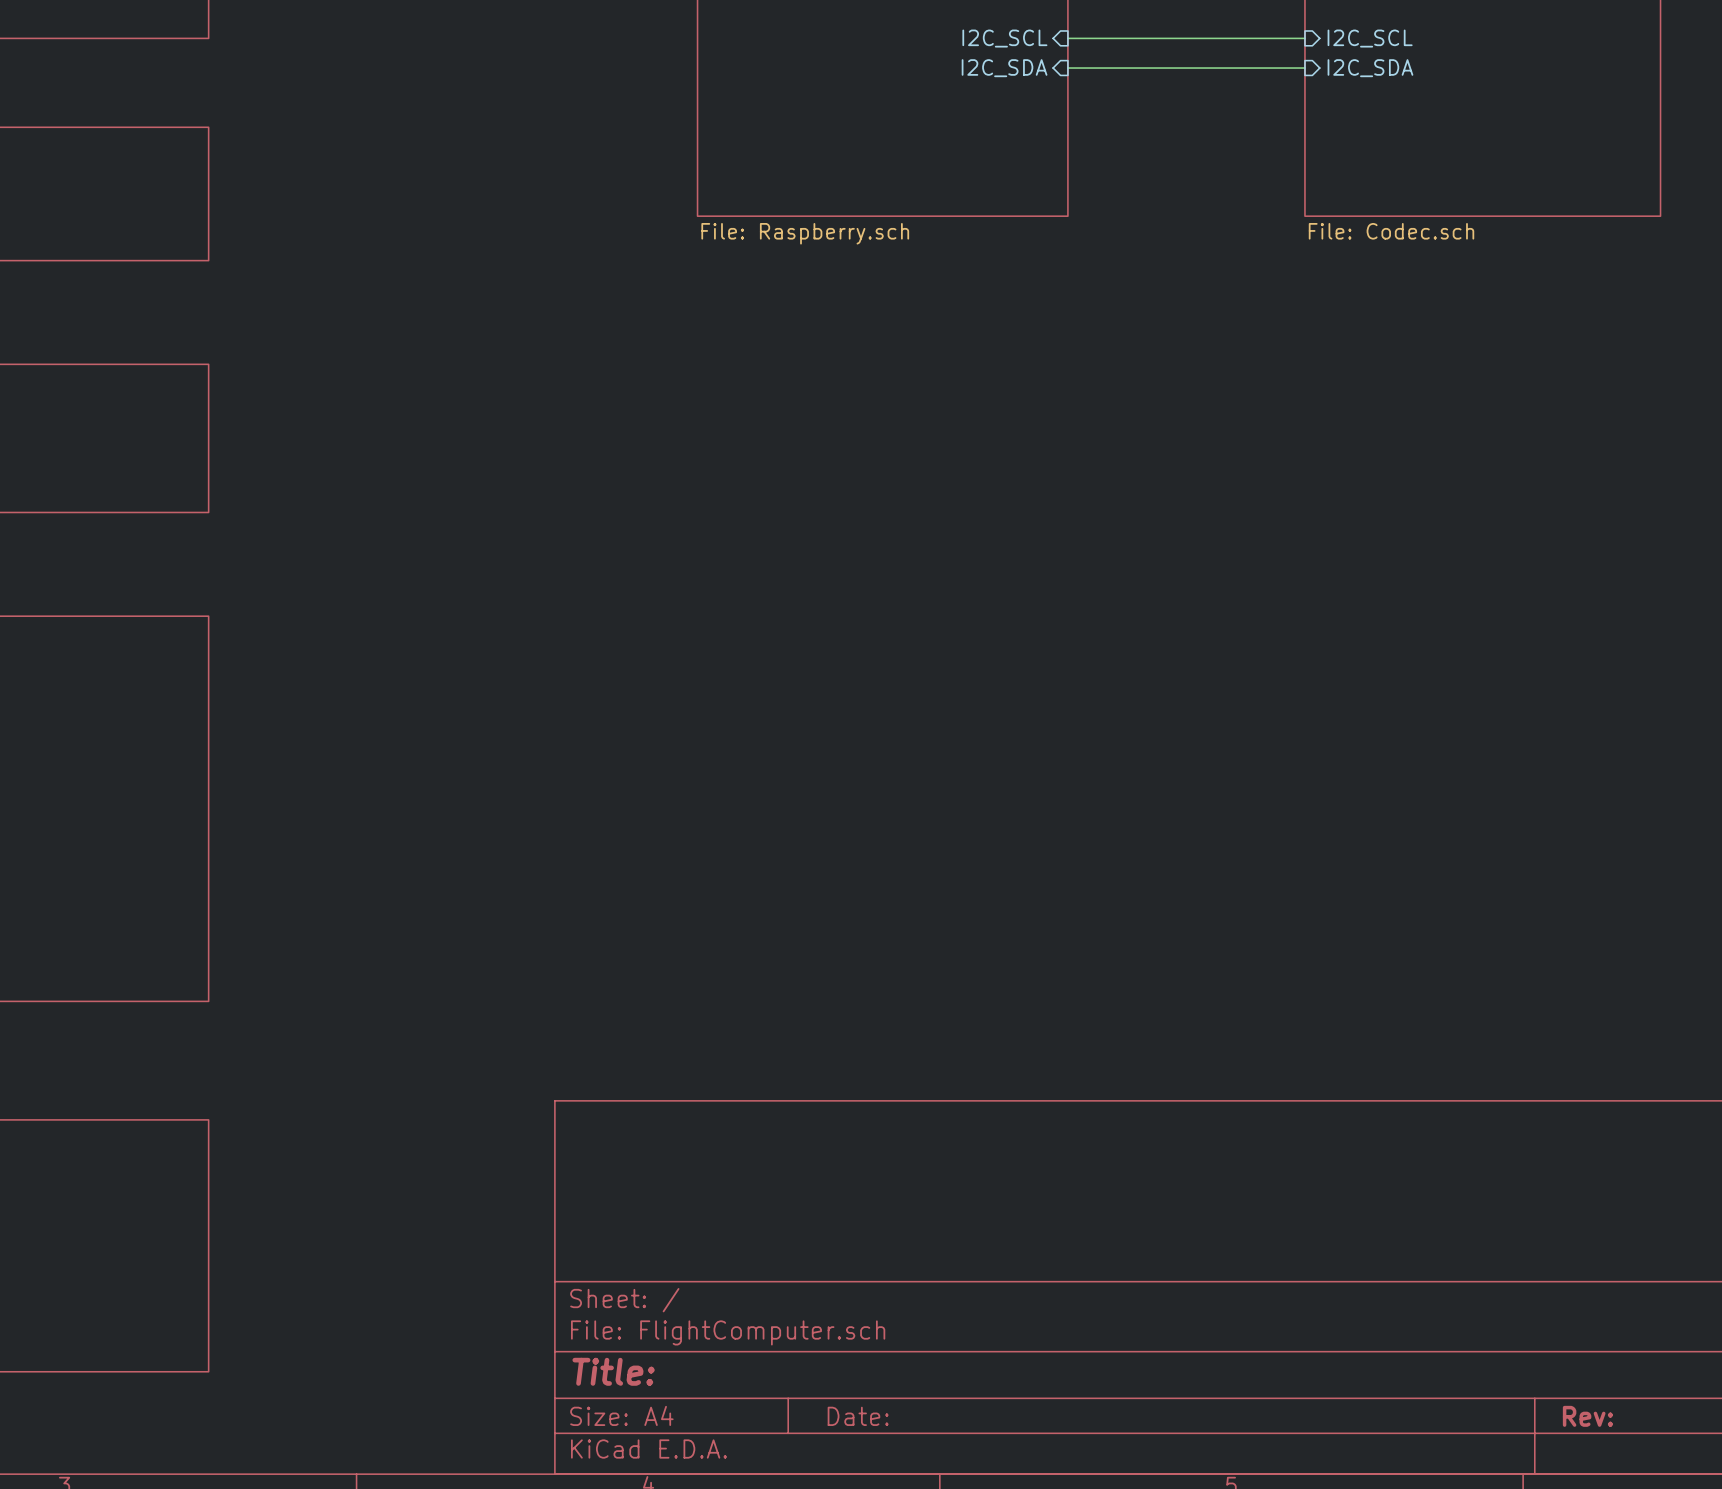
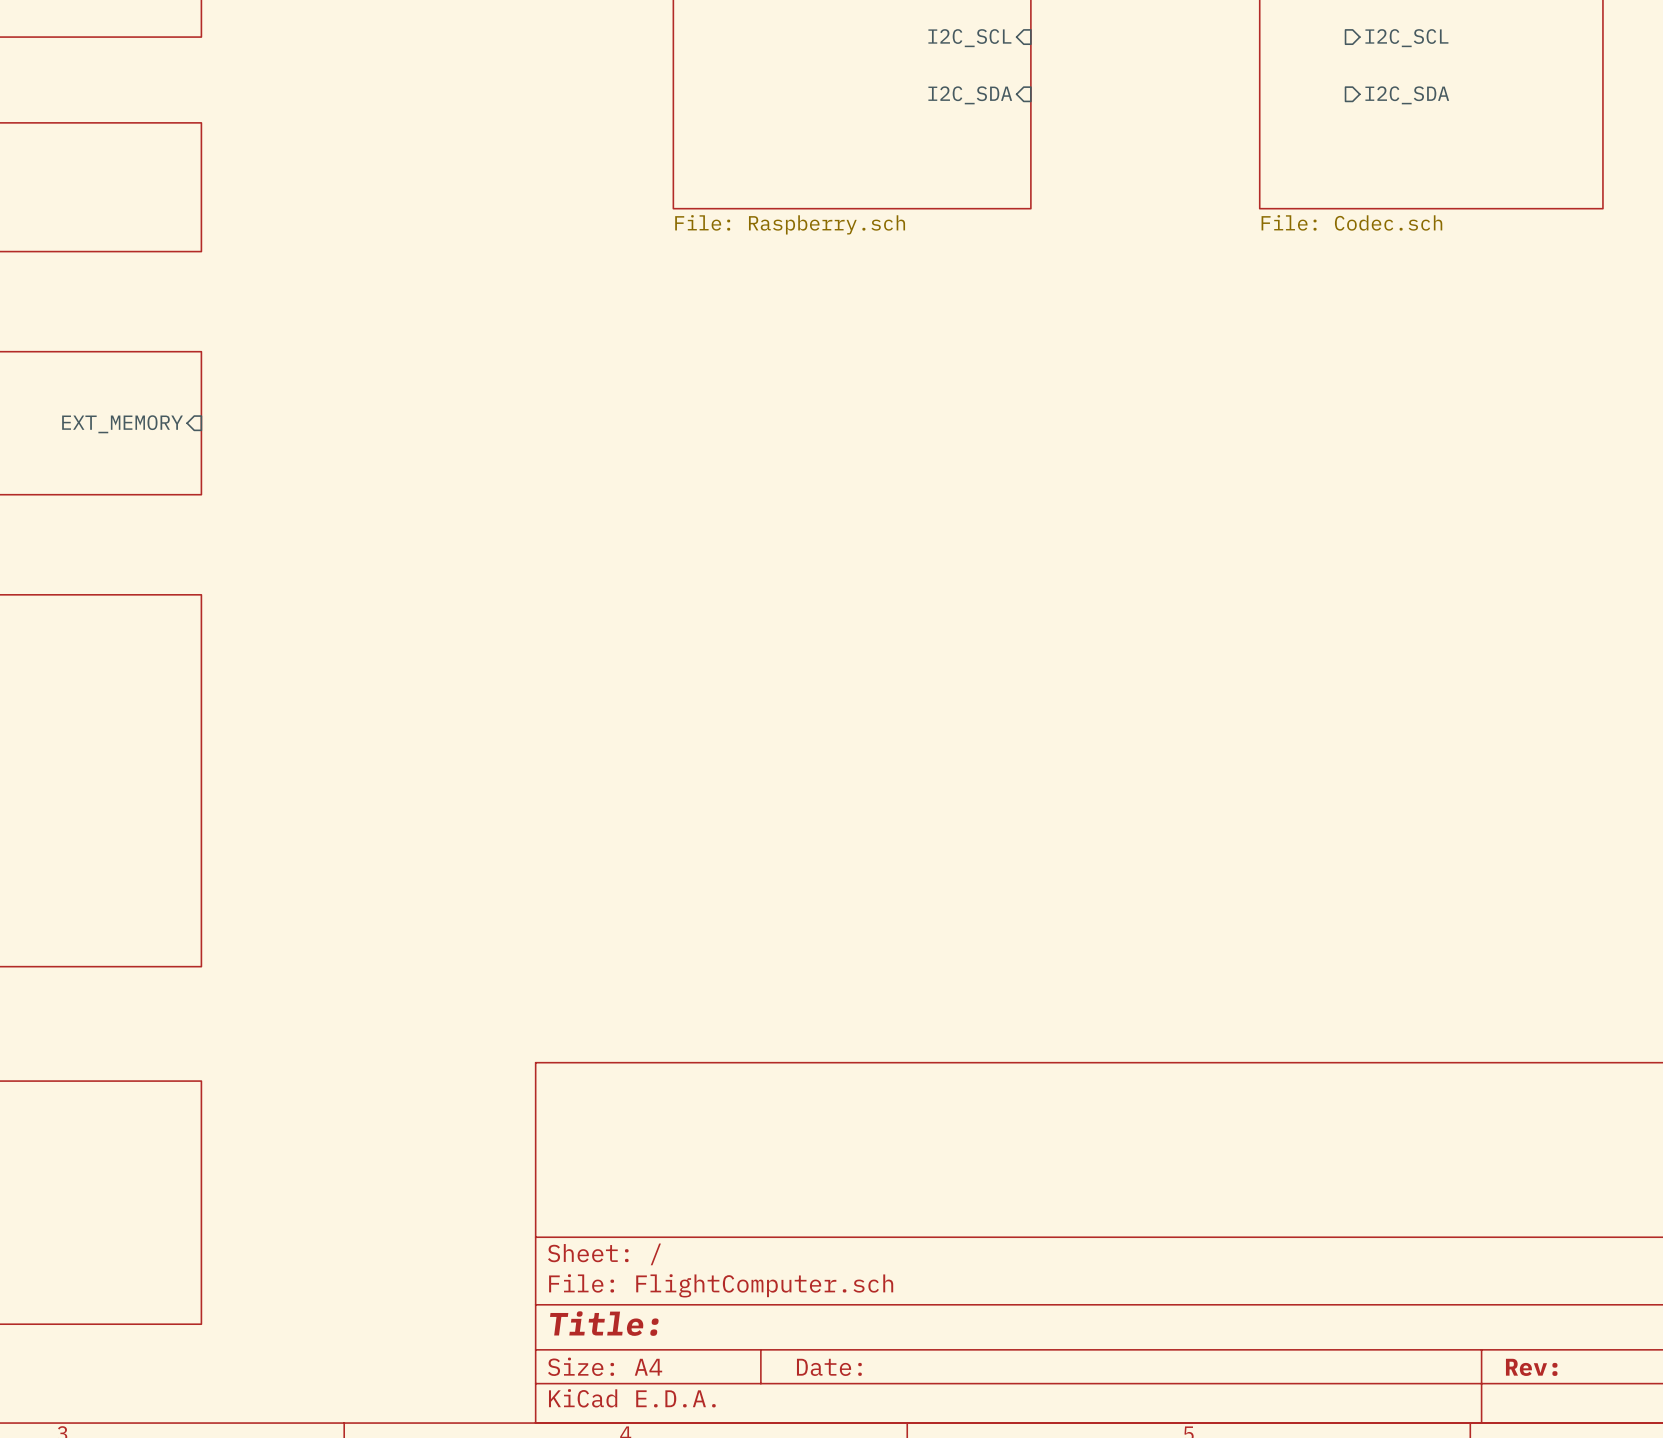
wire: (1067, 38) (1304, 38) -> none
sheet pin position: I2C_SCL (1370, 38) -> I2C_SCL (1406, 38)
sheet pin position: I2C_SDA (1004, 68) -> I2C_SDA (970, 95)
wire: (1067, 68) (1304, 68) -> none
sheet pin position: I2C_SDA (1370, 68) -> I2C_SDA (1407, 95)
sheet pin: none -> EXT_MEMORY (122, 424)

